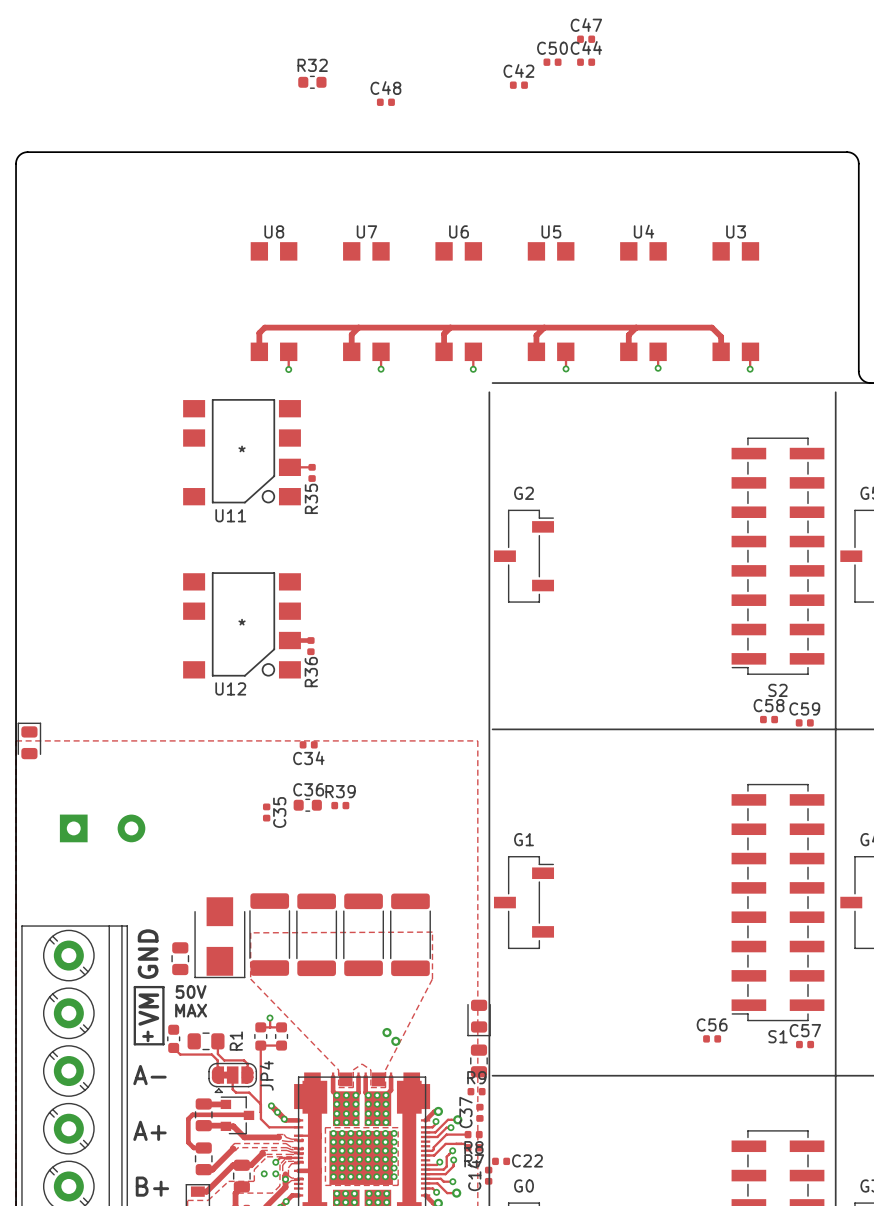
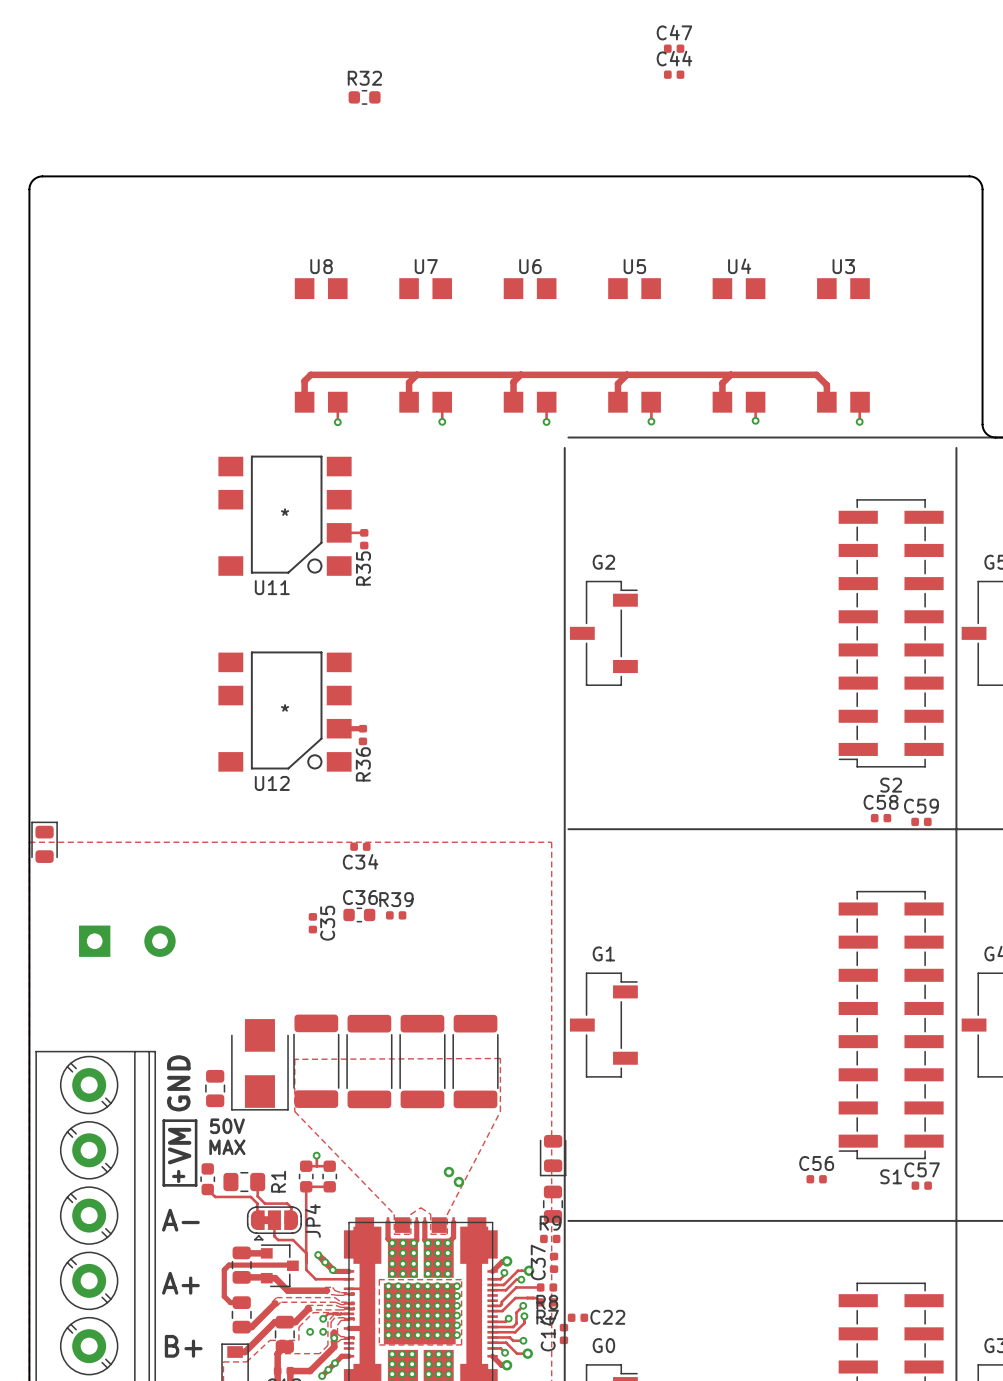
C50: (552, 62) -> none
C42: (518, 85) -> none
C48: (385, 102) -> none

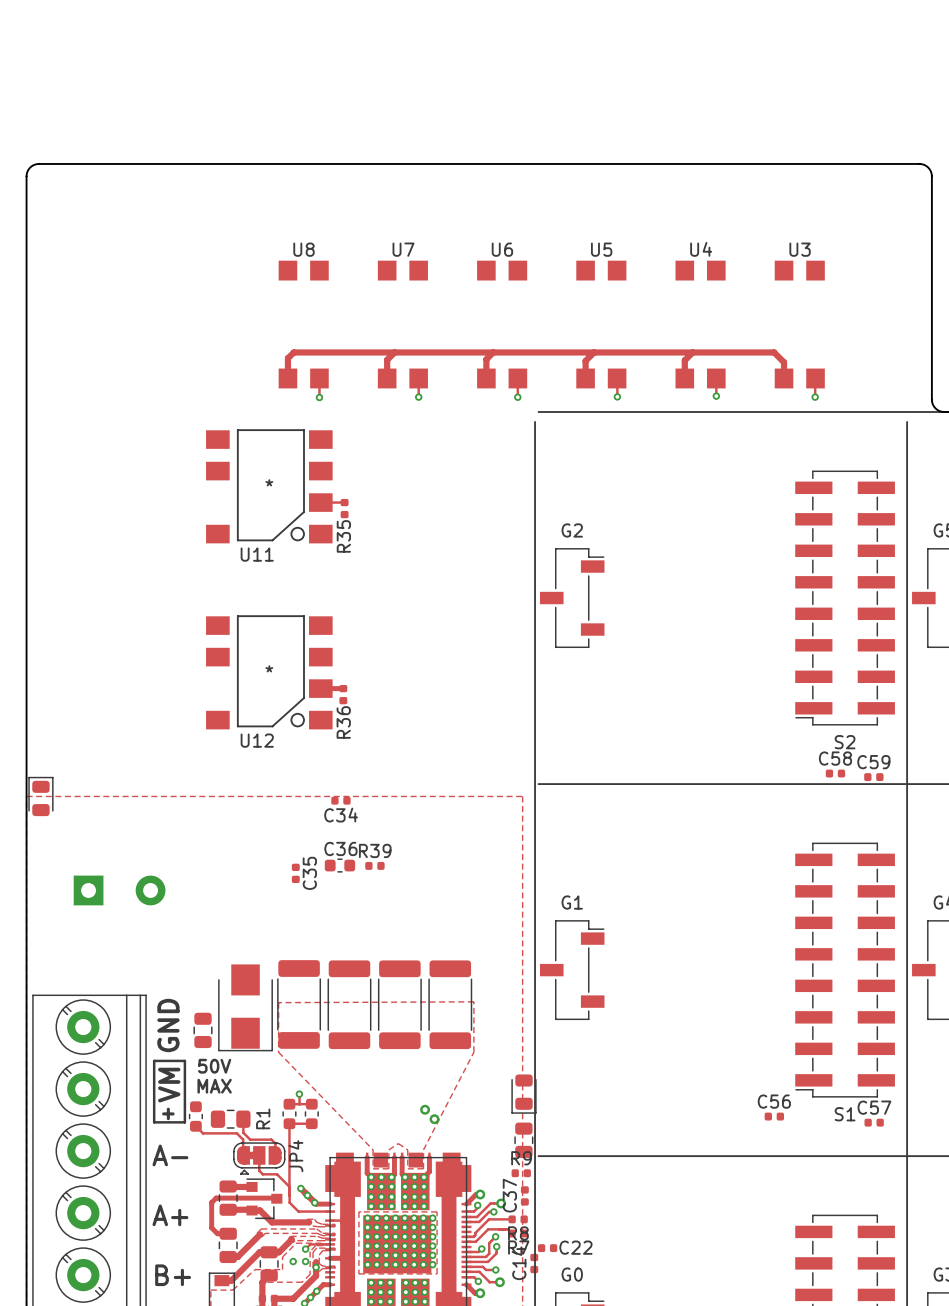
C47: (674, 48) -> none
C44: (674, 74) -> none
R32: (364, 97) -> none

